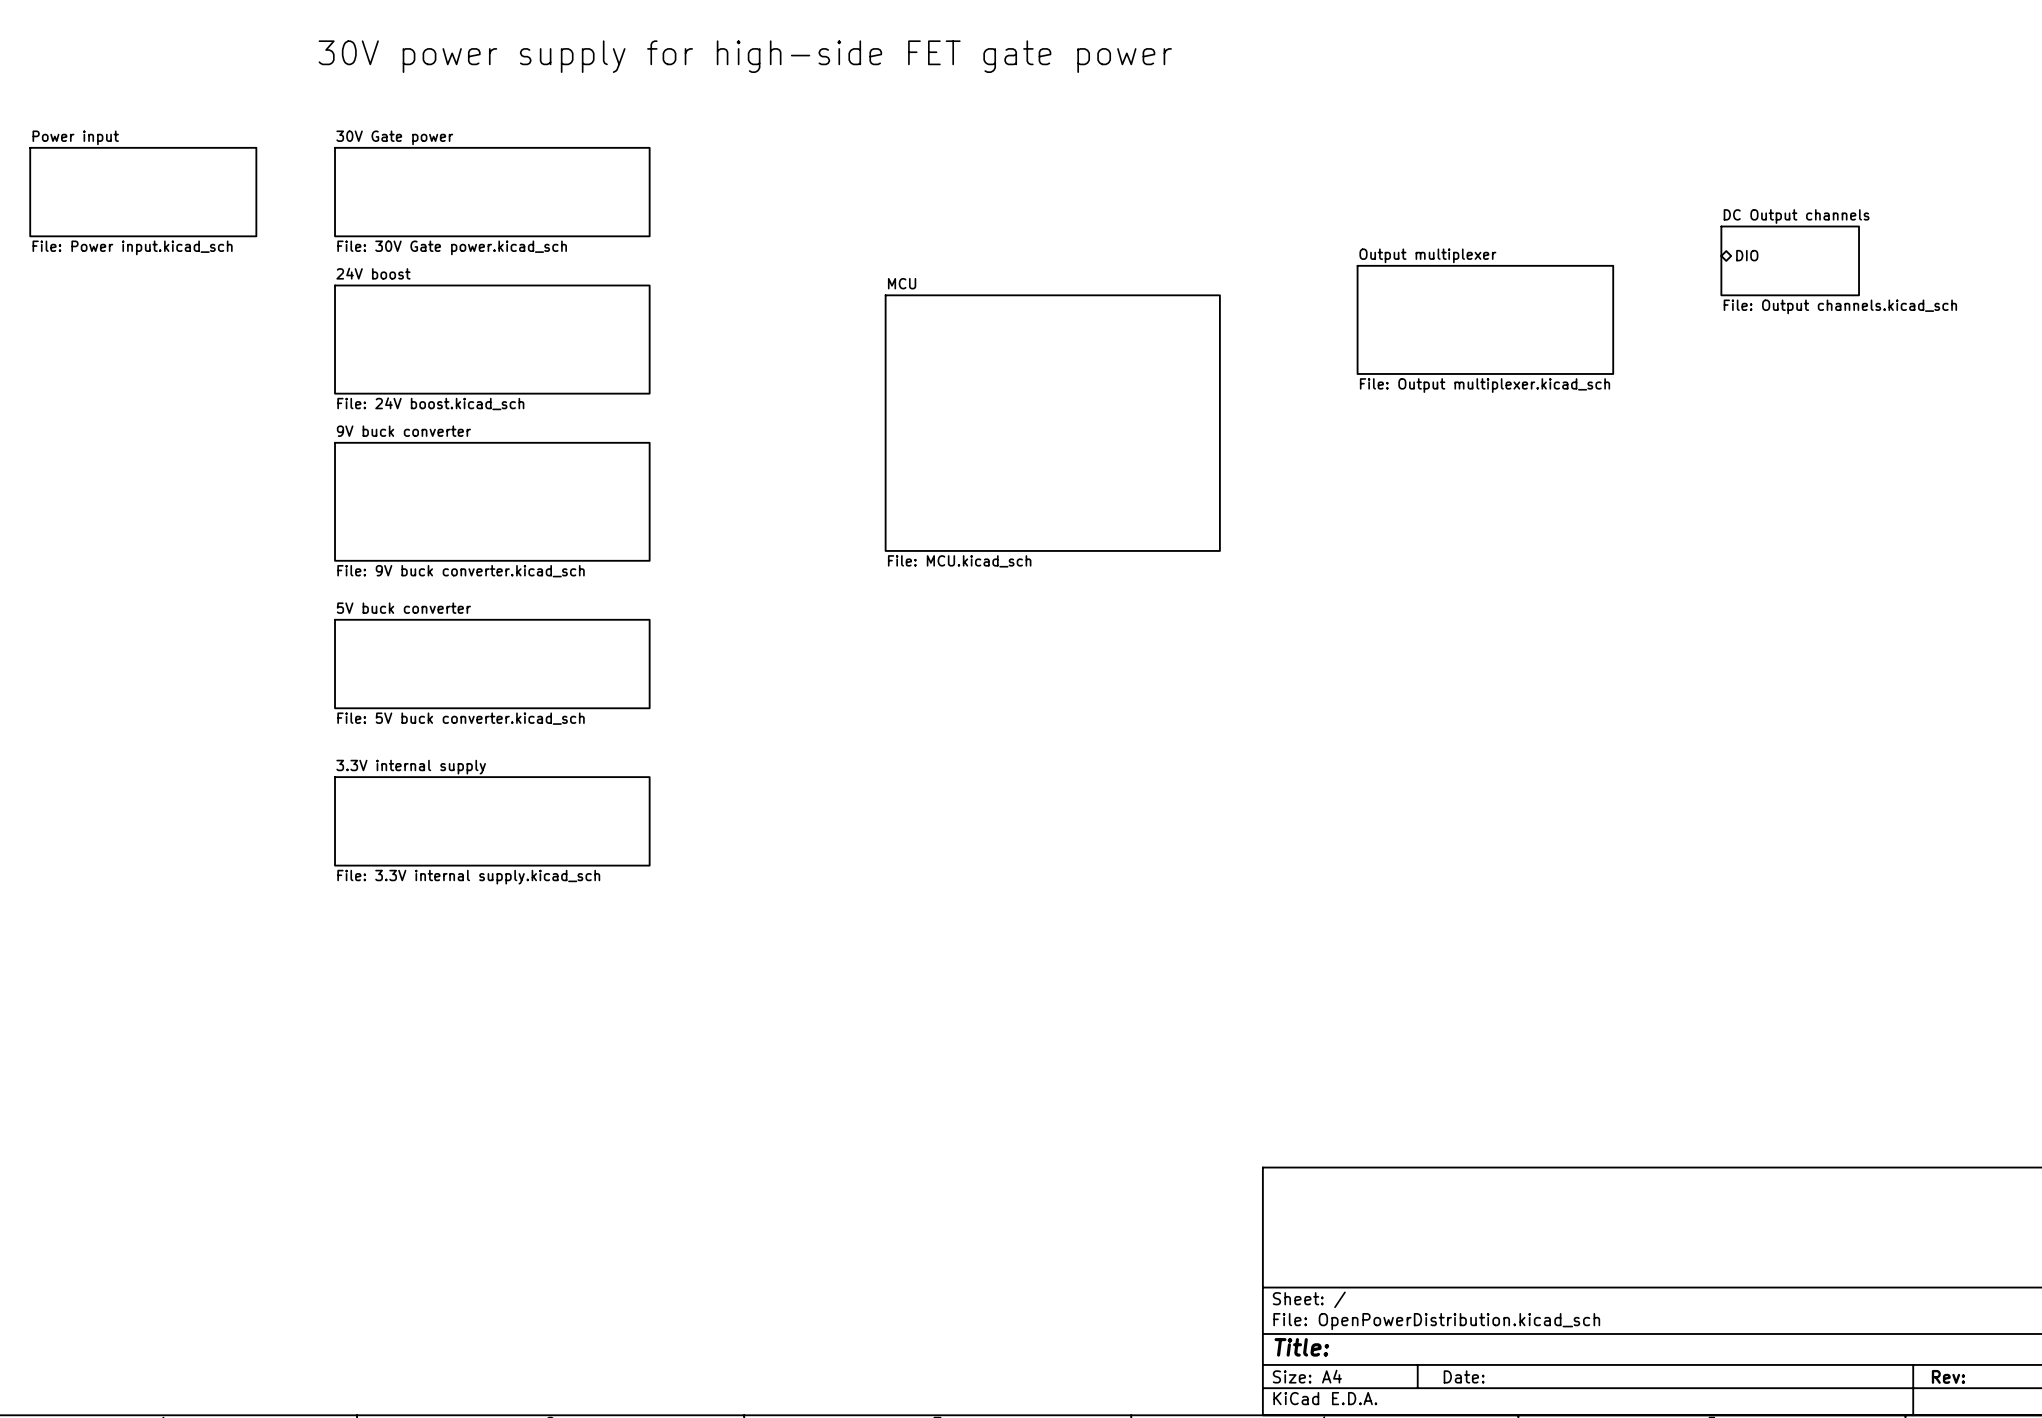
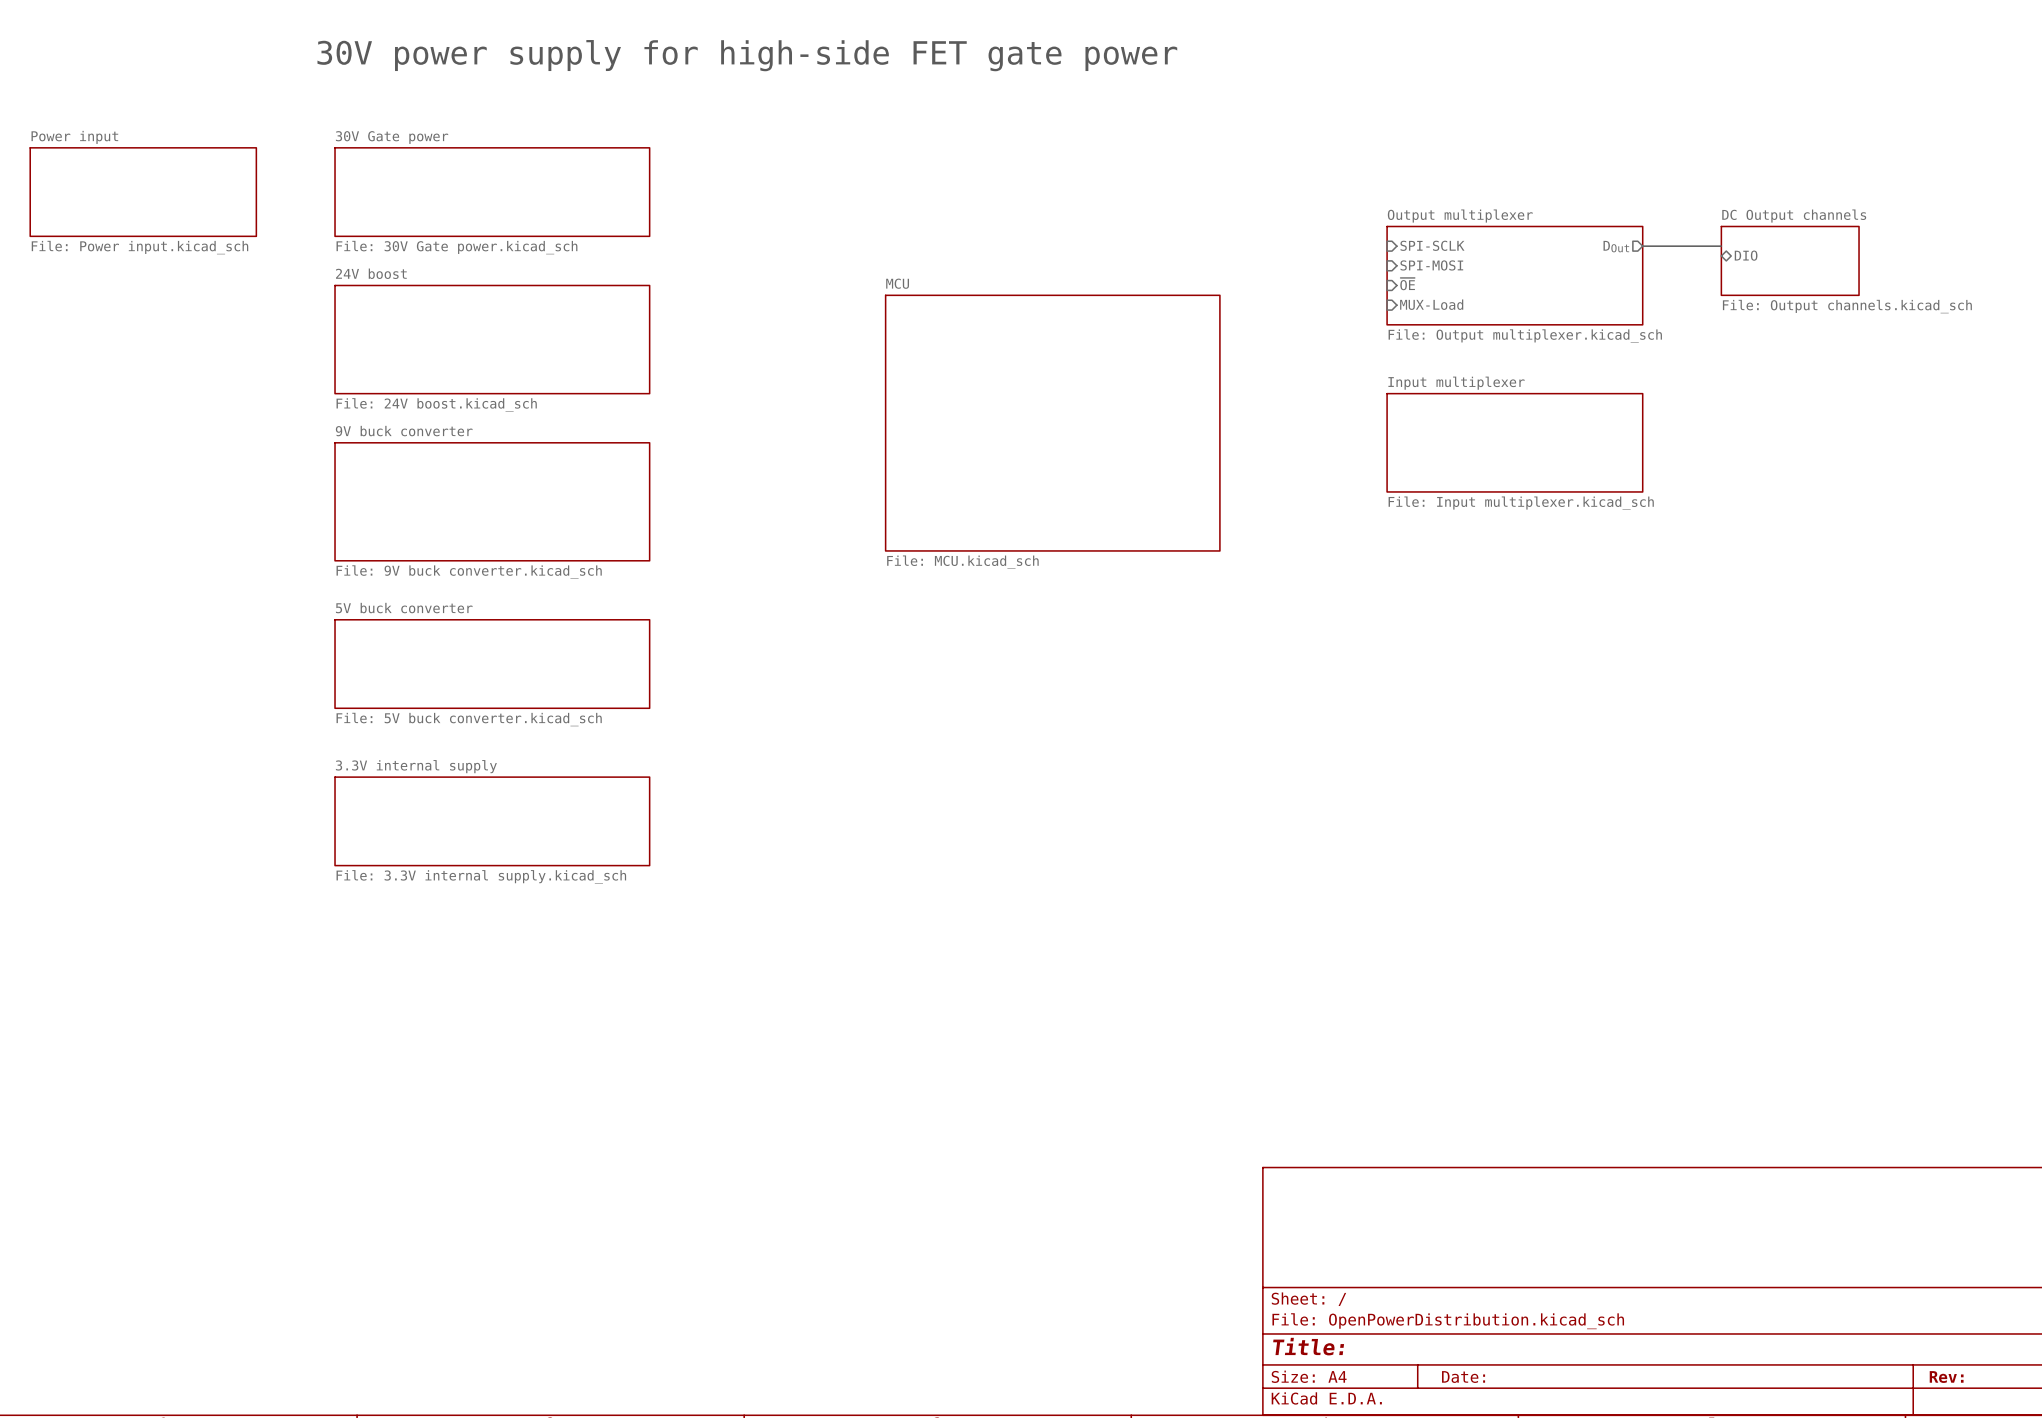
sheet pin: none -> SPI-SCLK (1432, 245)
sheet pin: none -> DOut (1616, 246)
bus: none -> (1642, 246) (1721, 246)
sheet pin: none -> SPI-MOSI (1431, 265)
sheet Output multiplexer: none -> File: Output multiplexer.kicad_sch (1514, 275)
sheet pin: none -> ~{OE} (1407, 284)
sheet pin: none -> MUX-Load (1431, 304)
sheet Output multiplexer: File: Output multiplexer.kicad_sch (1485, 319) -> none
sheet Input multiplexer: none -> File: Input multiplexer.kicad_sch (1514, 442)

